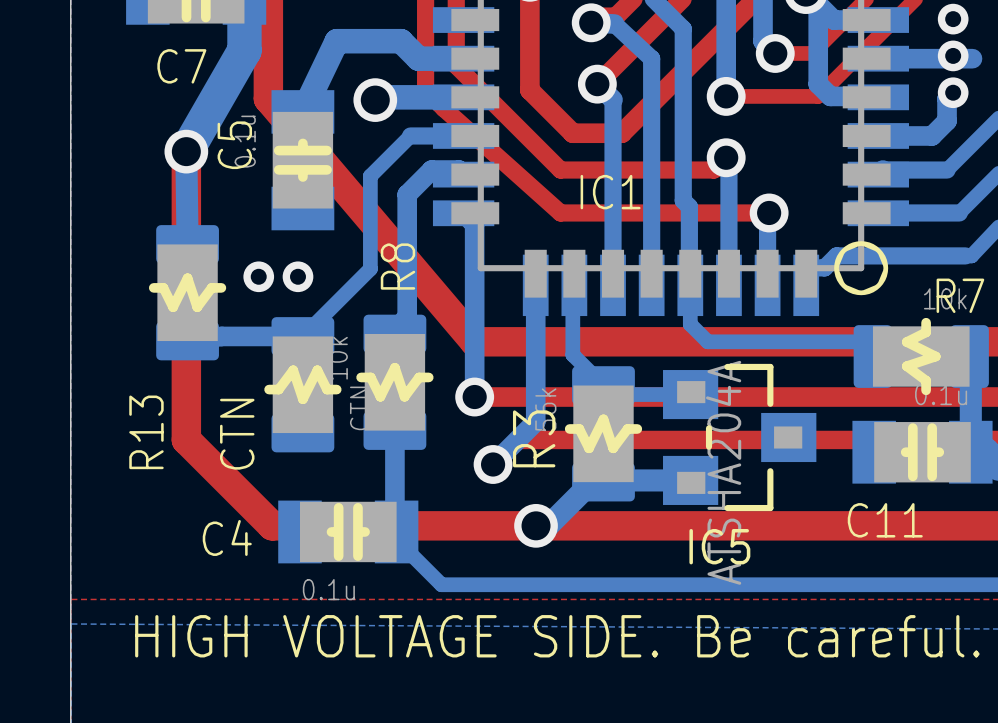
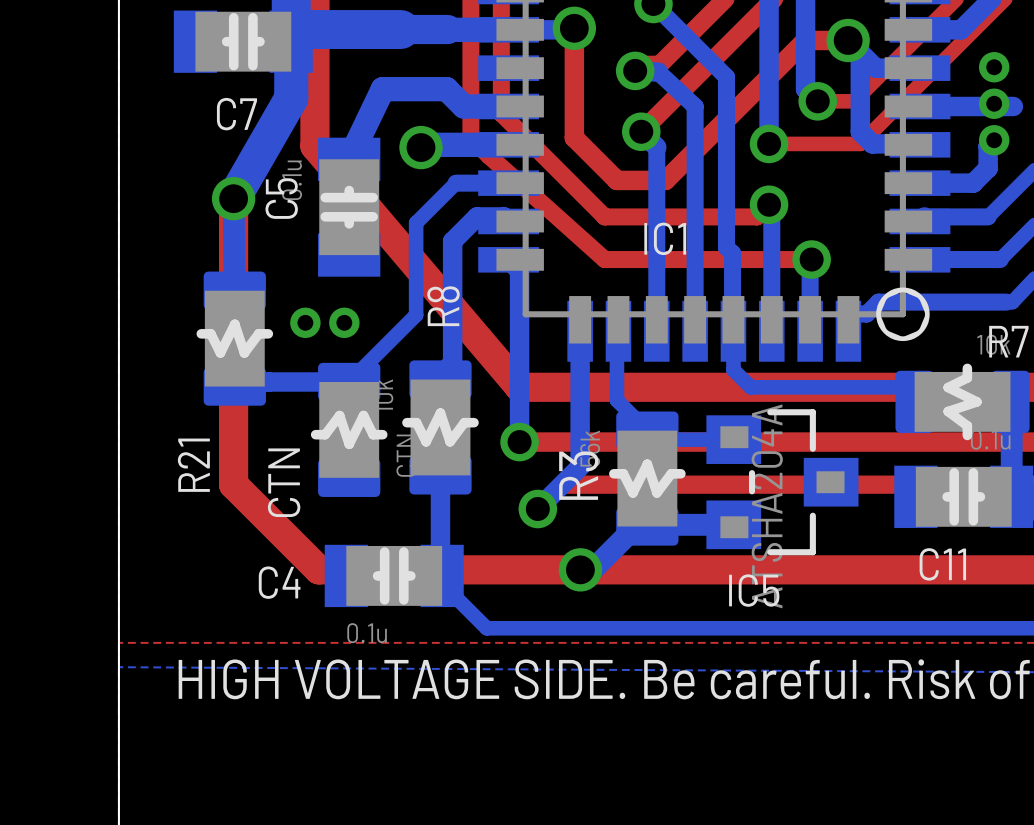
R13 name: R13 (146, 432) -> R21 (193, 465)

